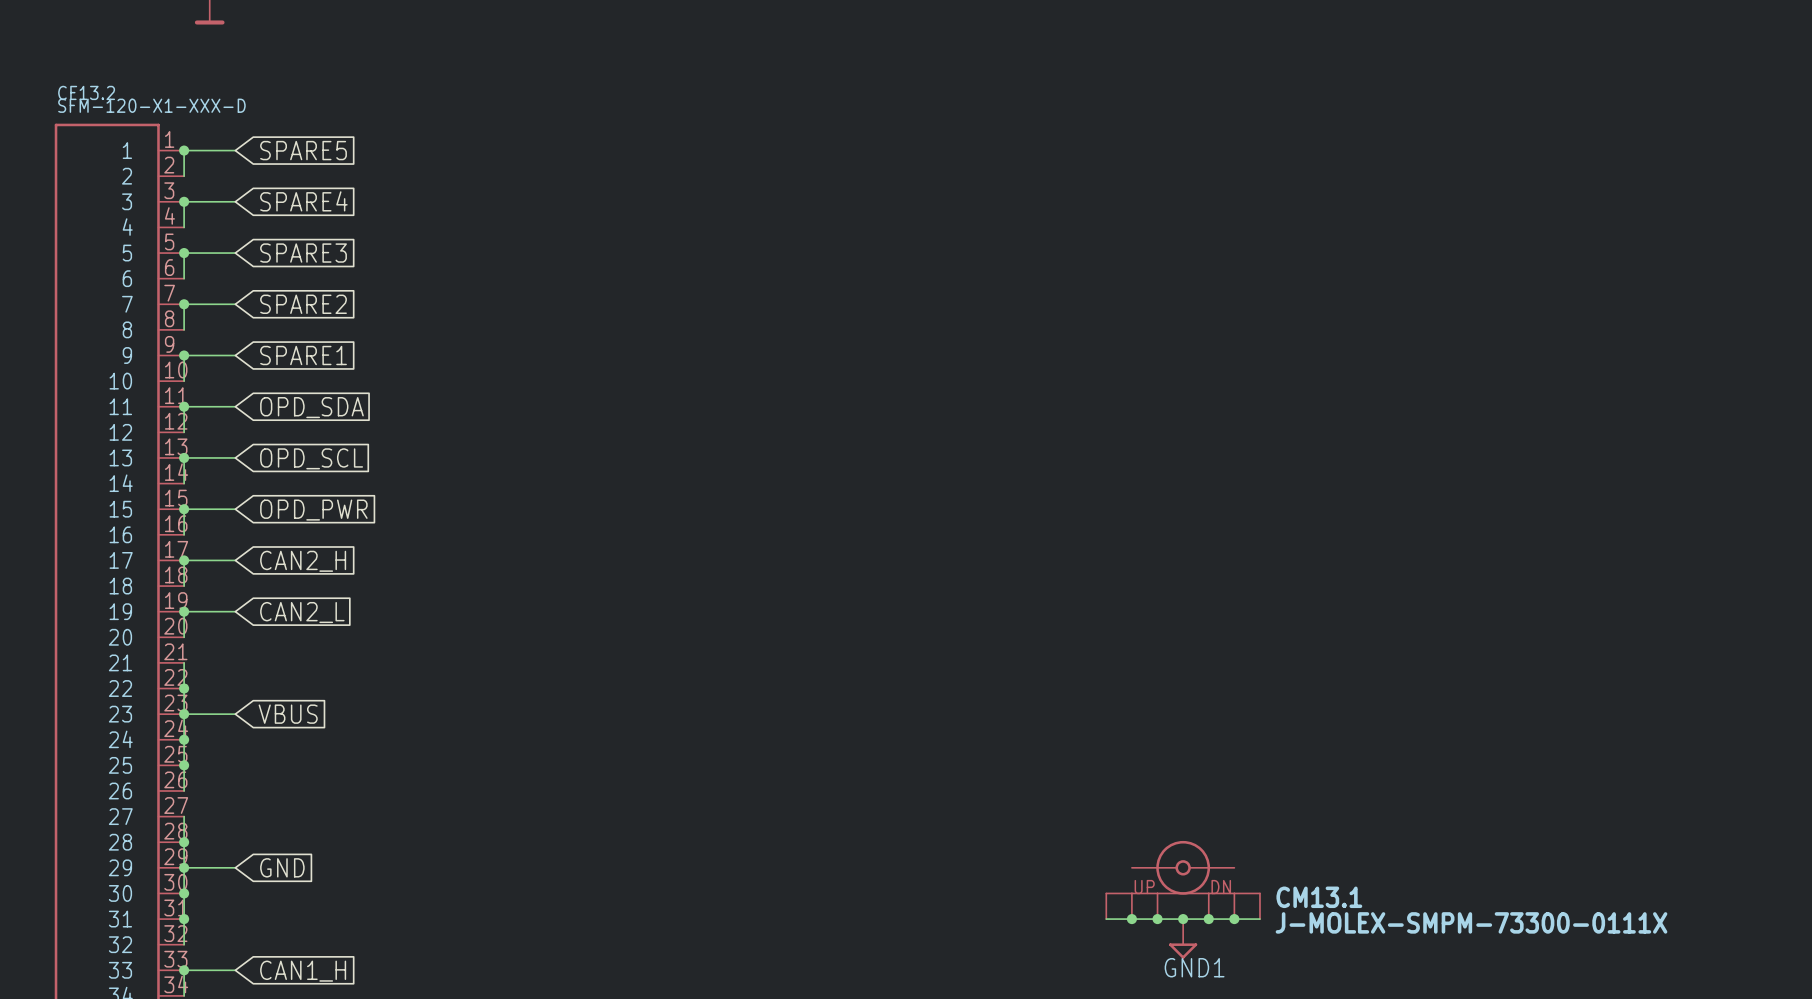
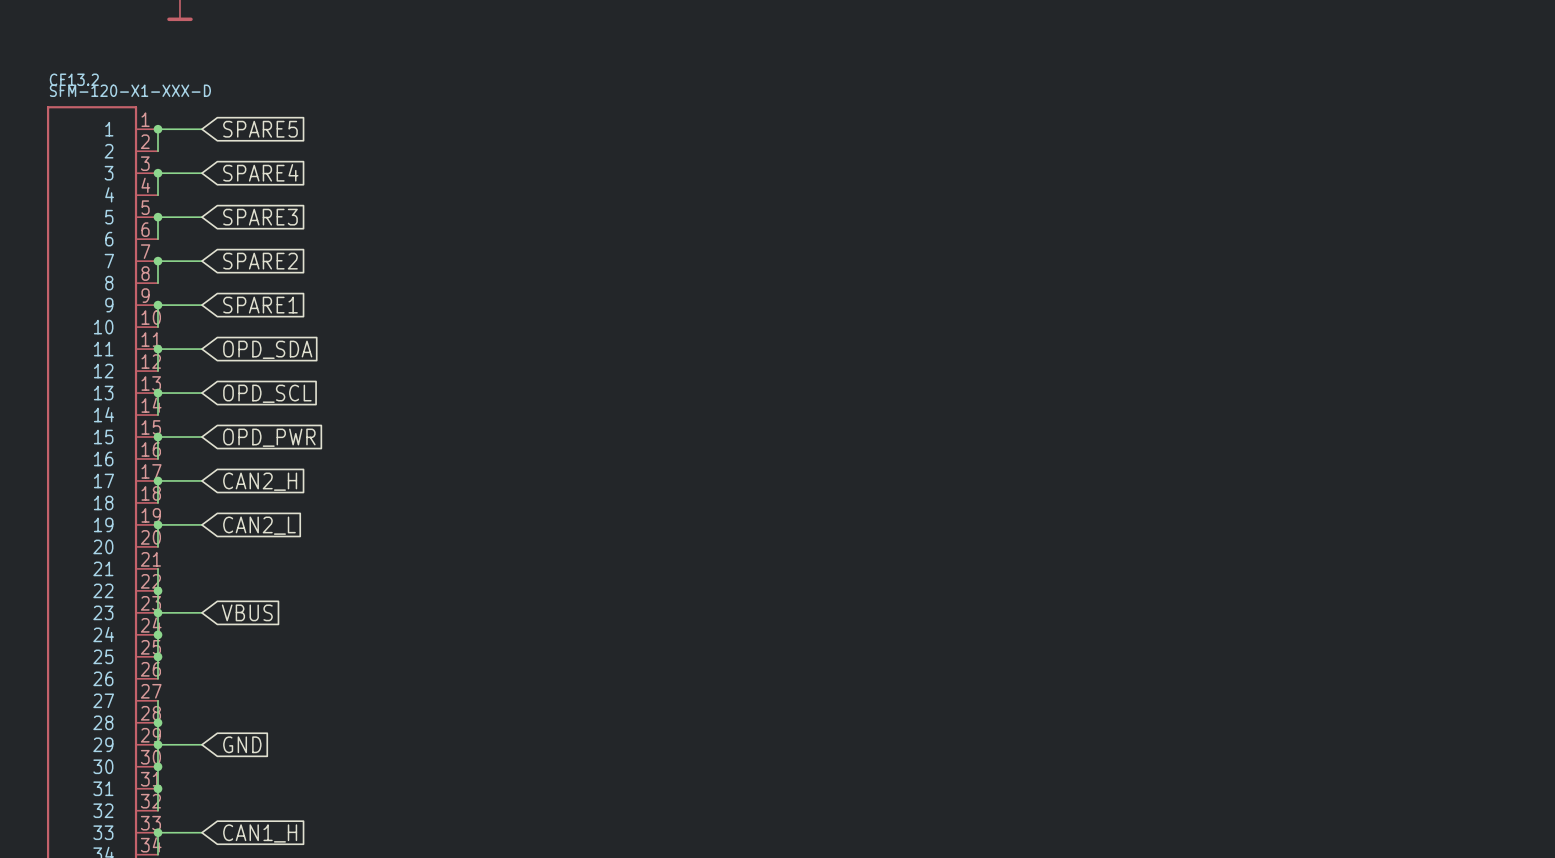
CM13.1: J-MOLEX-SMPM-73300-0111X (1183, 880) -> none
wire: (1106, 919) (1259, 919) -> none
junction: (1131, 919) -> none
junction: (1157, 919) -> none
junction: (1183, 919) -> none
junction: (1208, 919) -> none
junction: (1234, 919) -> none
power symbol: GND1 (1183, 938) -> none

